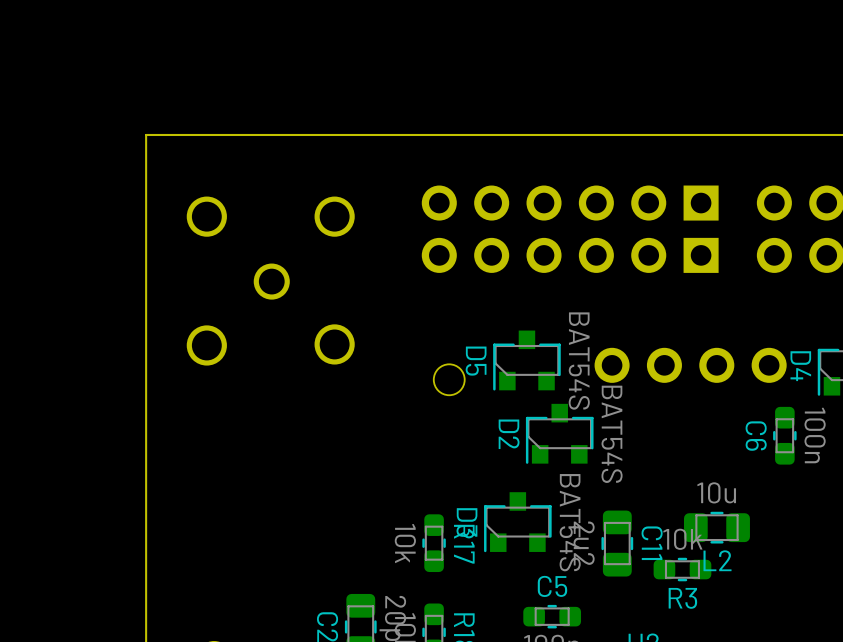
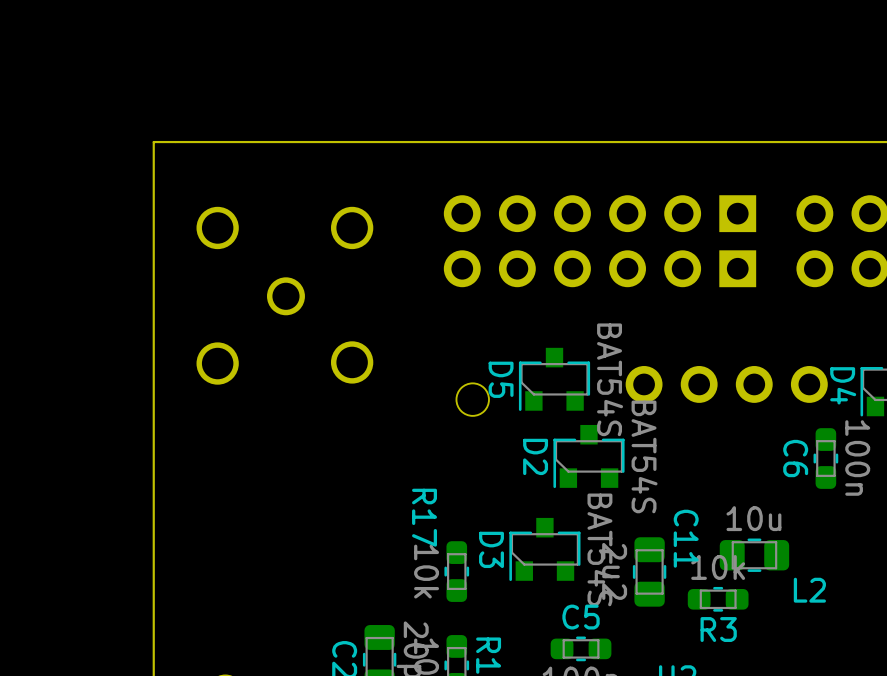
C11 name position: C11 (652, 543) -> C11 (686, 538)
R17 name position: R17 (464, 544) -> R17 (424, 517)
L2 name position: L2 (717, 560) -> L2 (809, 590)

